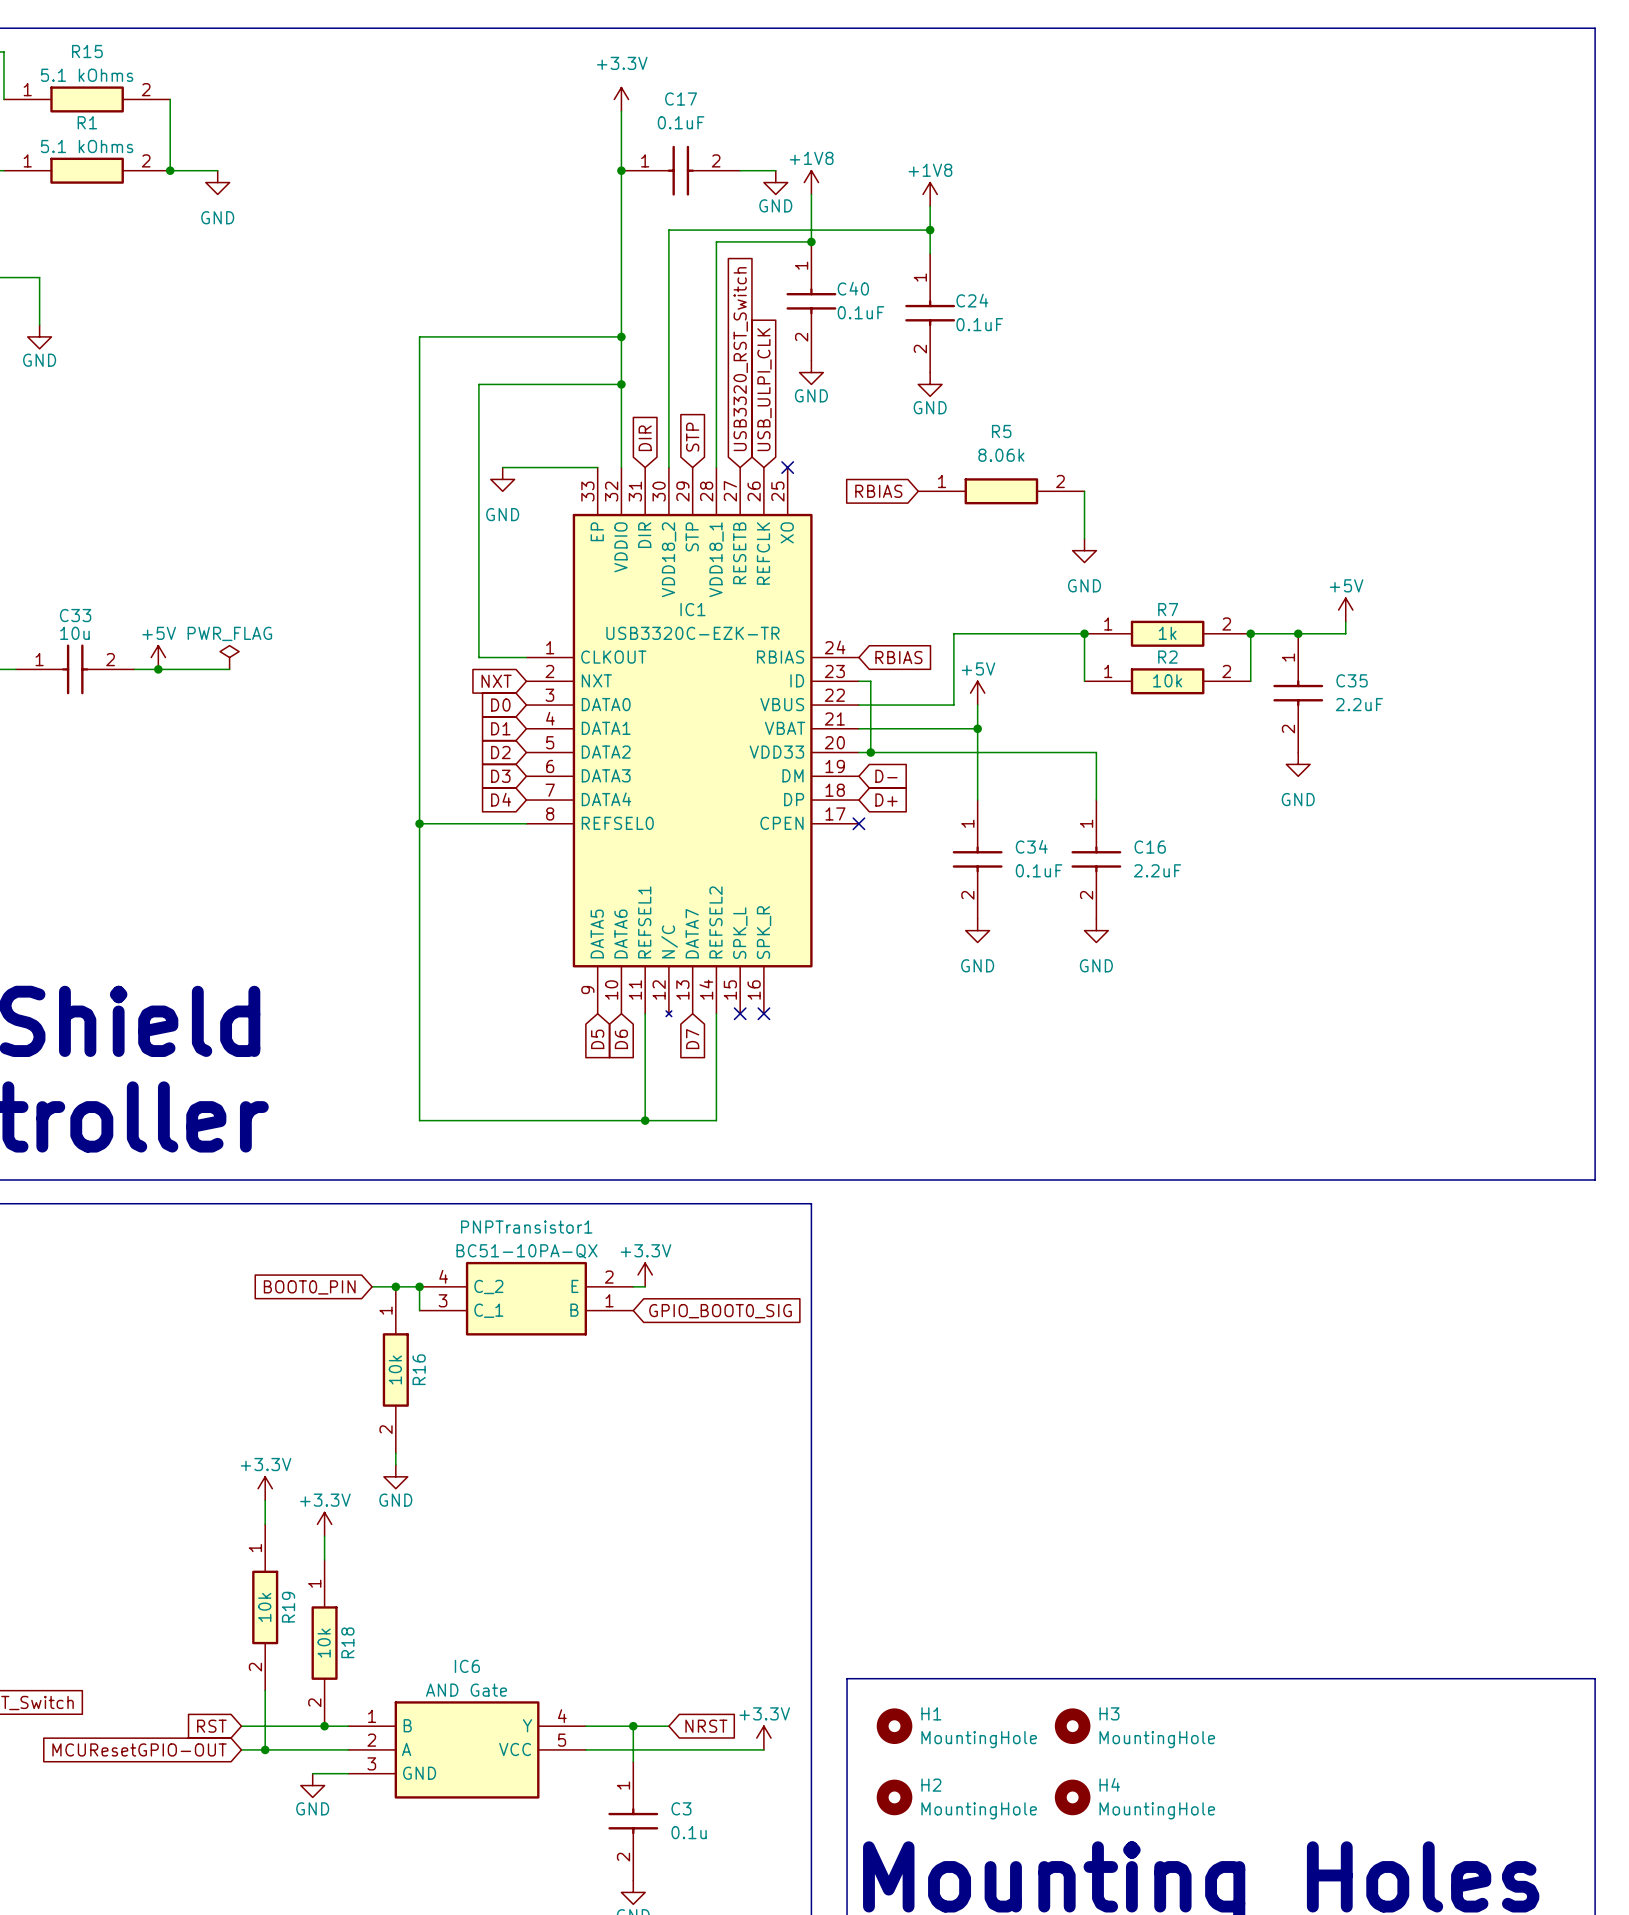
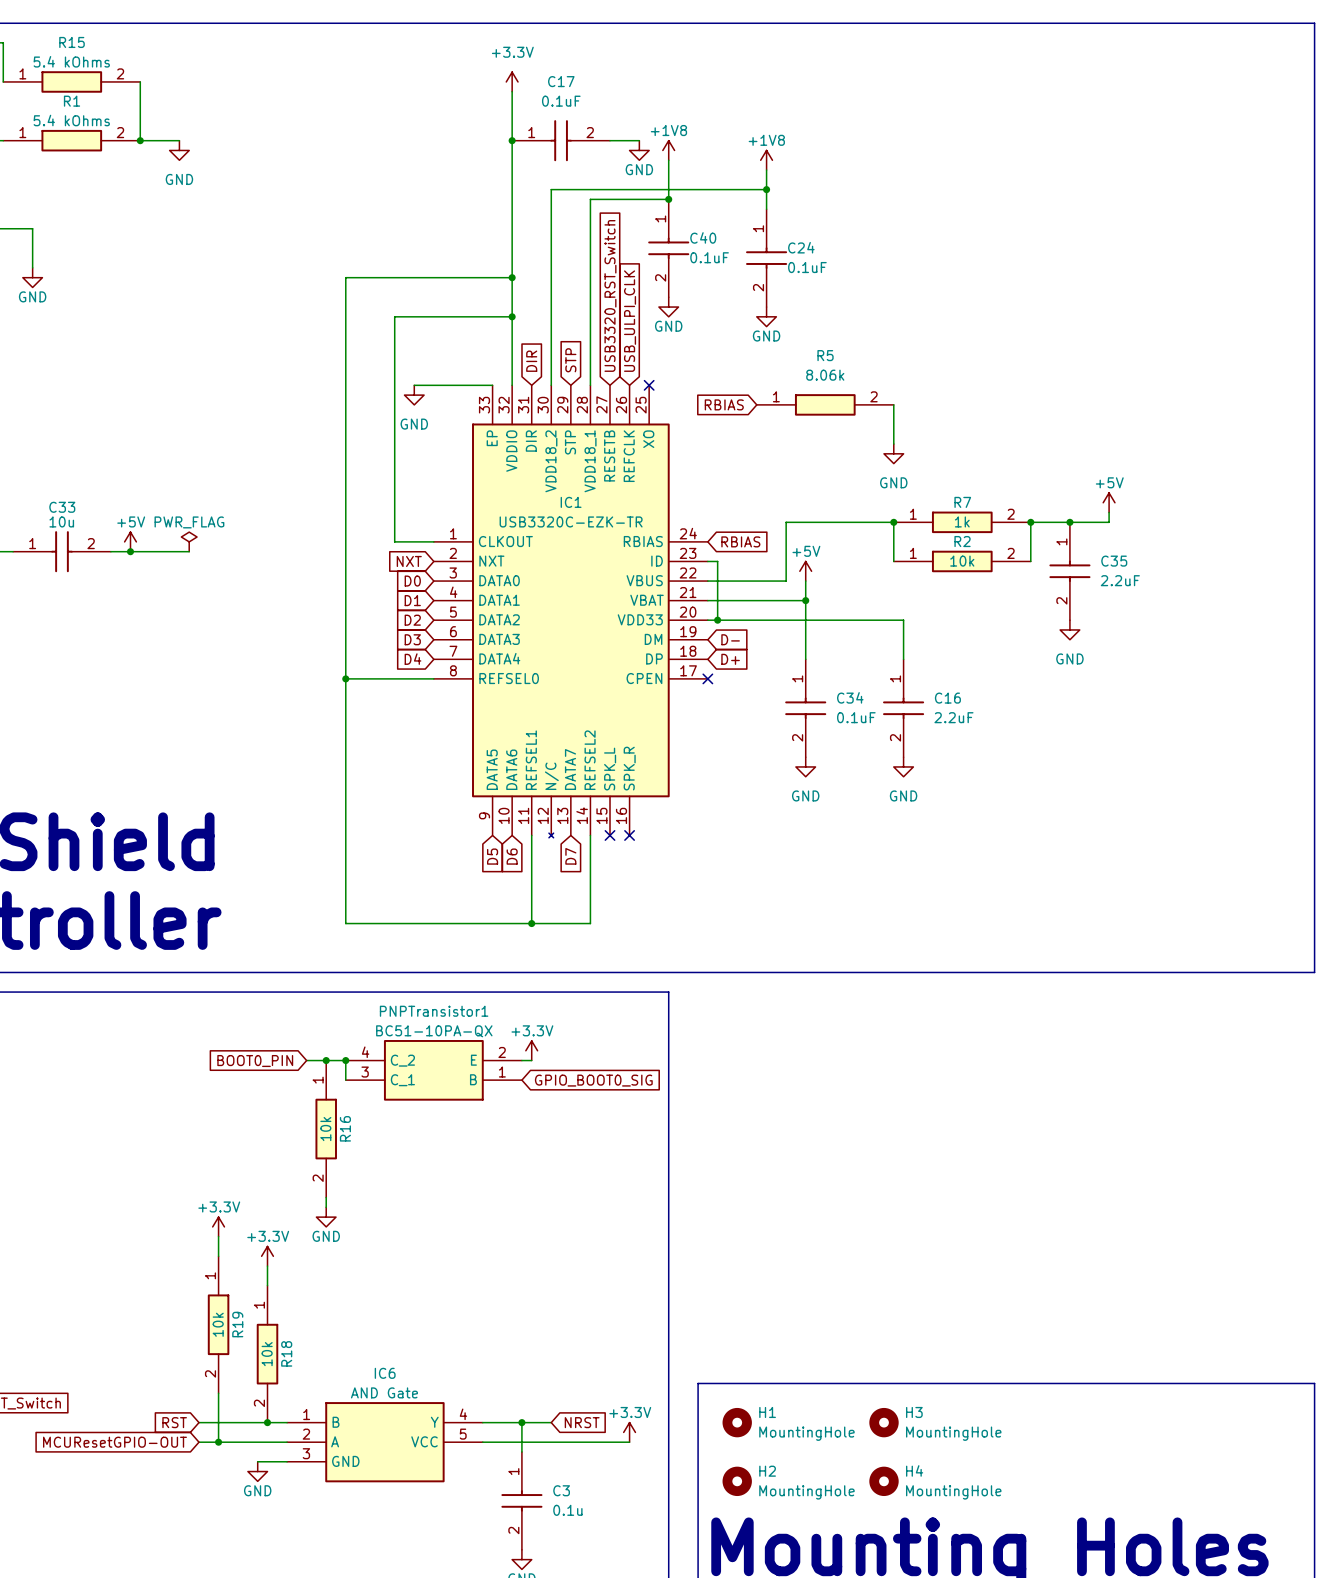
R15 value: 5.1 kOhms (87, 75) -> 5.4 kOhms (71, 61)
R1 value: 5.1 kOhms (87, 146) -> 5.4 kOhms (71, 120)

